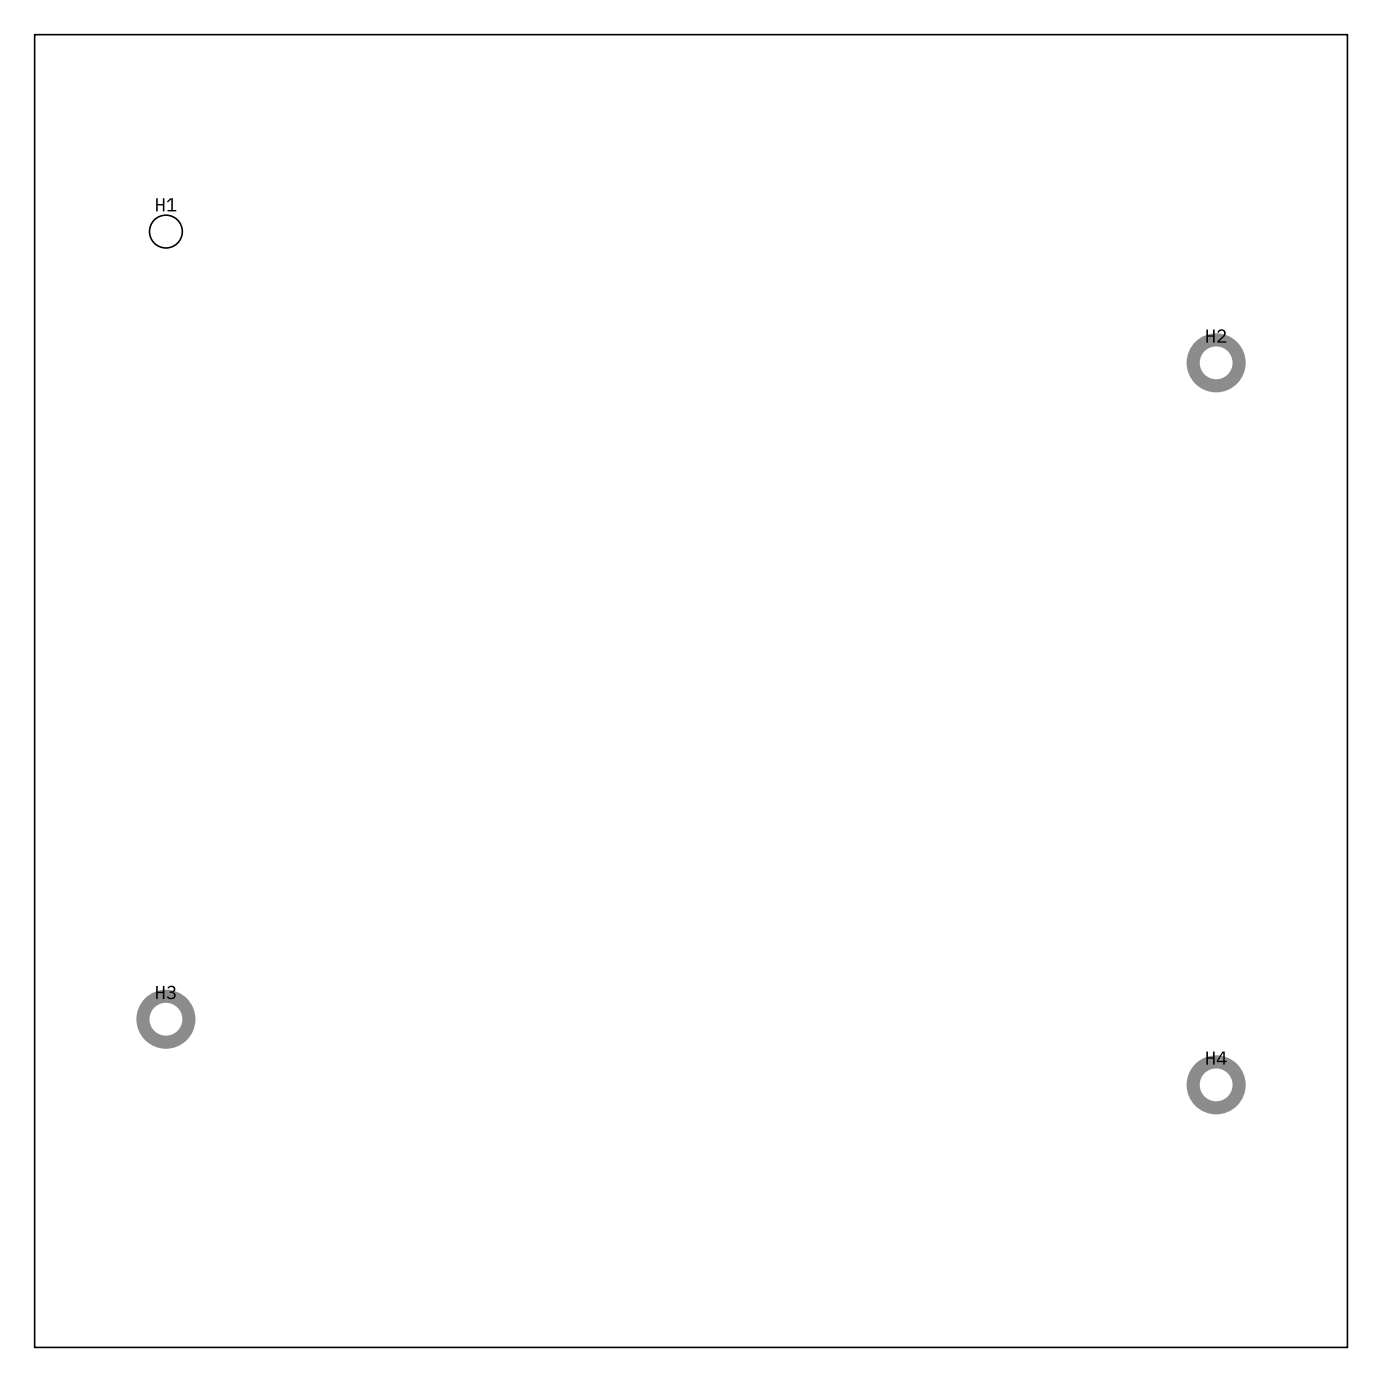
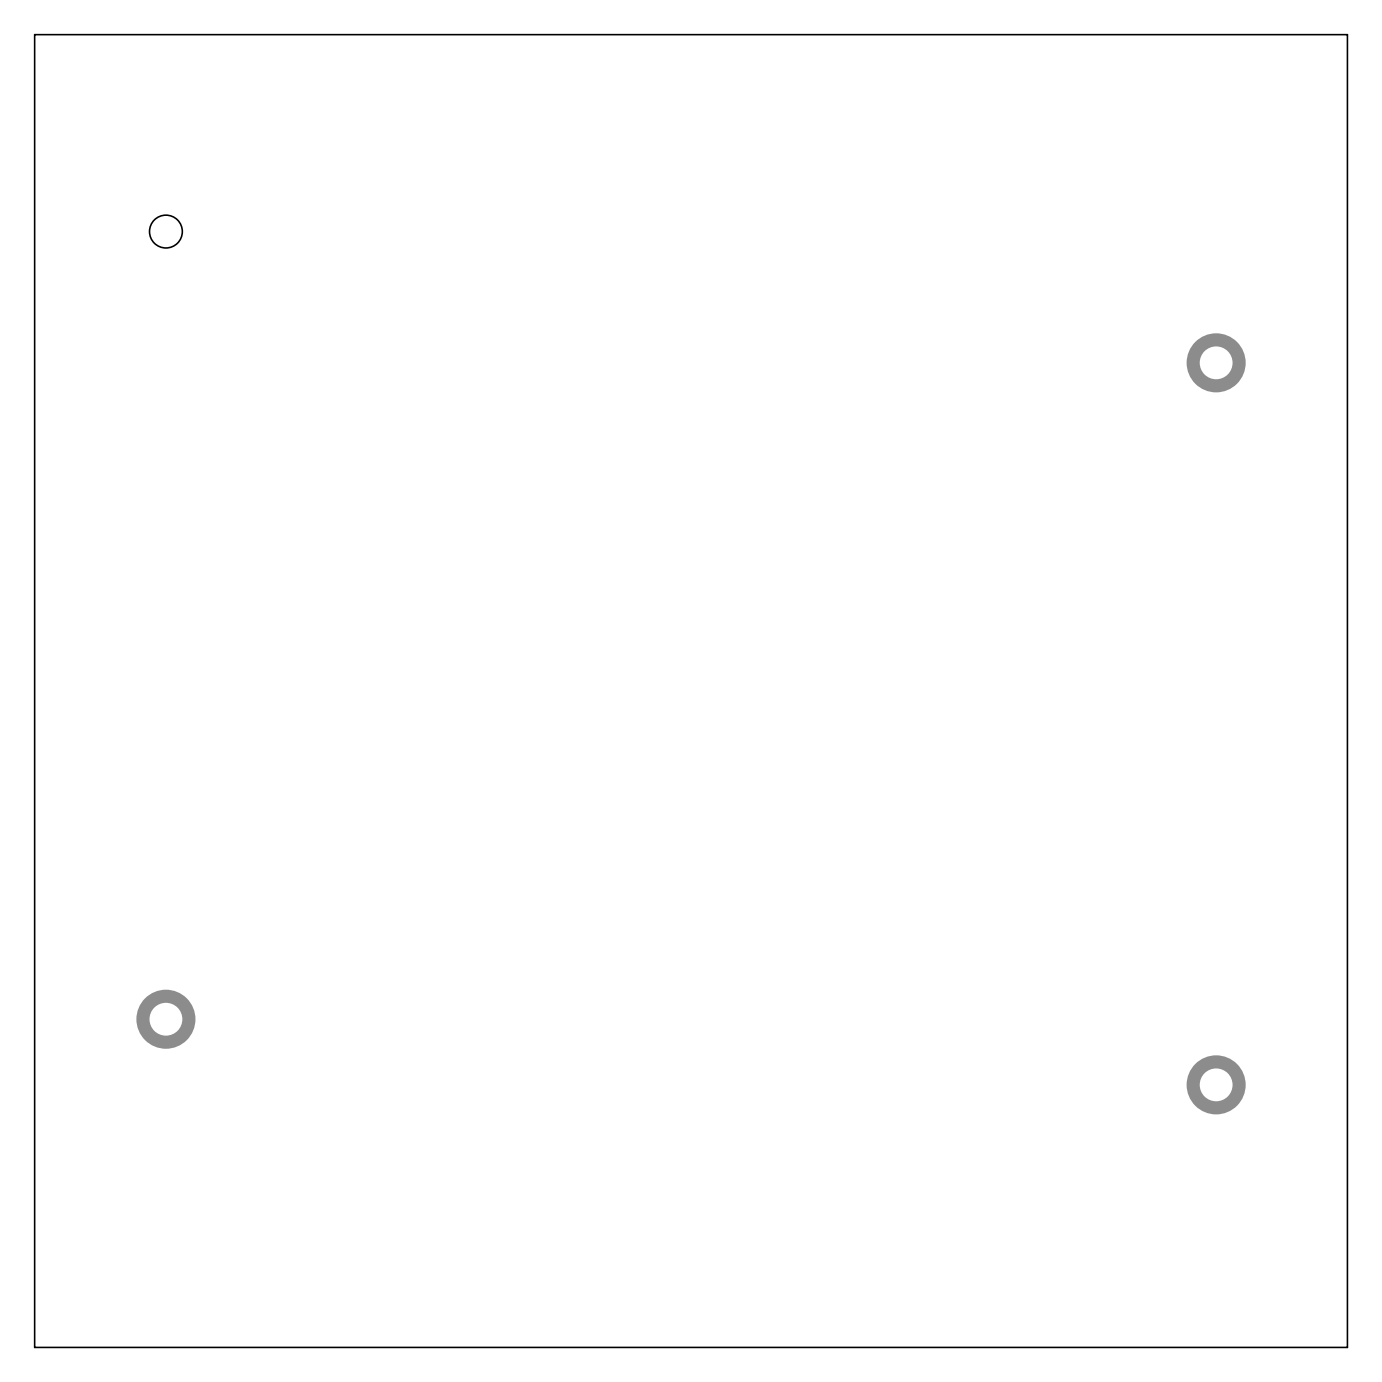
H1 name: H1 (166, 204) -> none
H2 name: H2 (1216, 335) -> none
H3 name: H3 (165, 992) -> none
H4 name: H4 (1216, 1058) -> none

